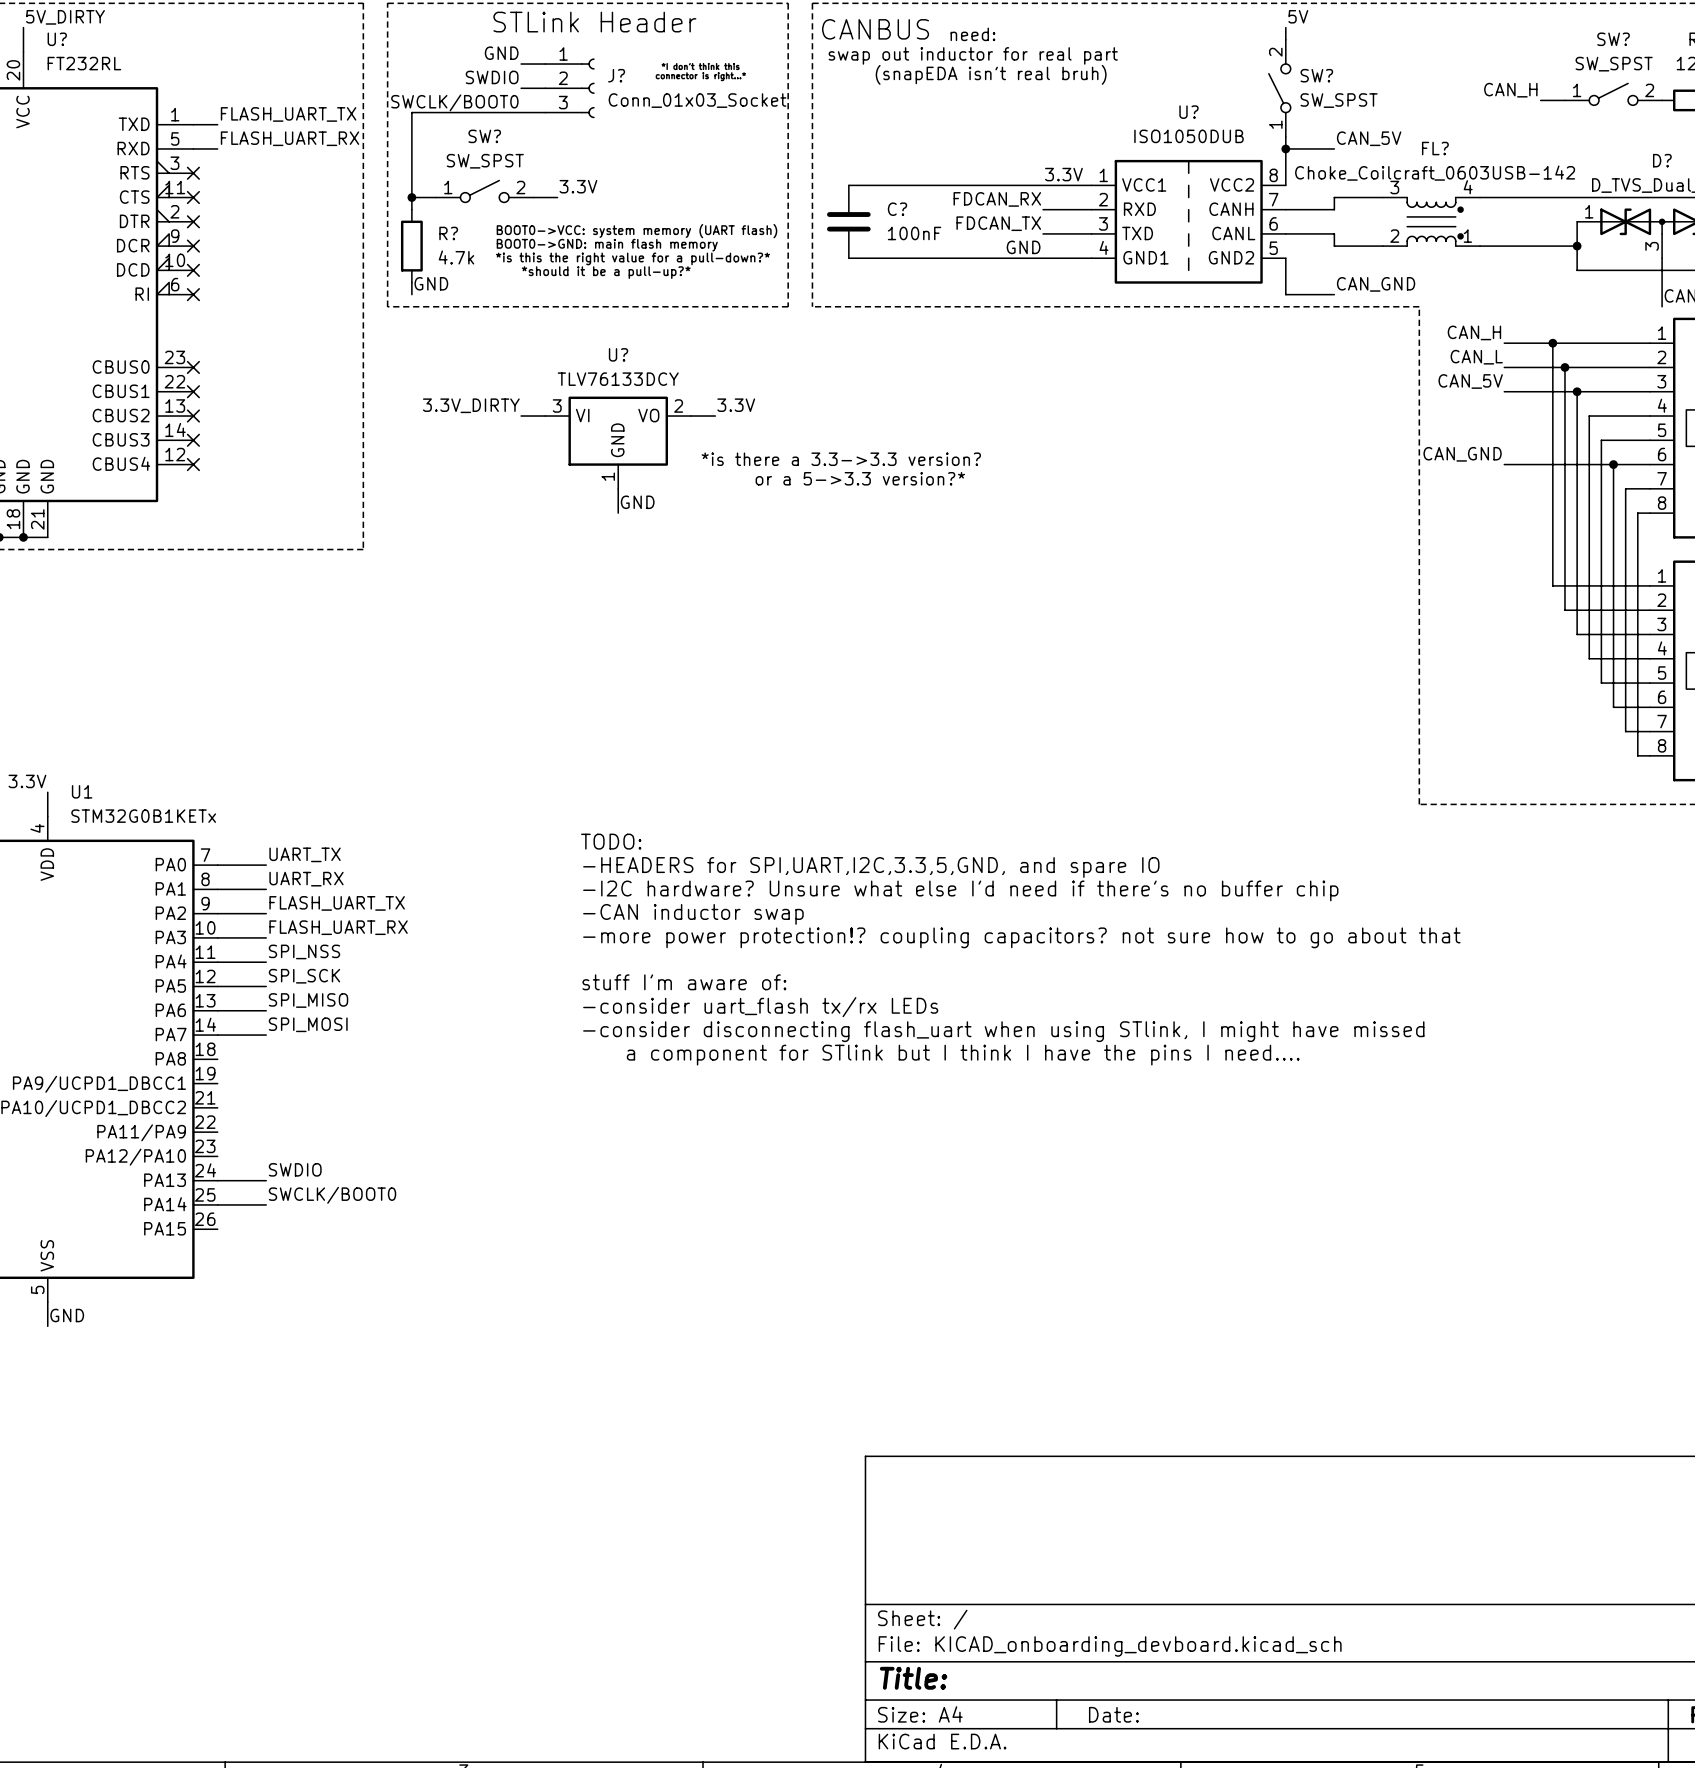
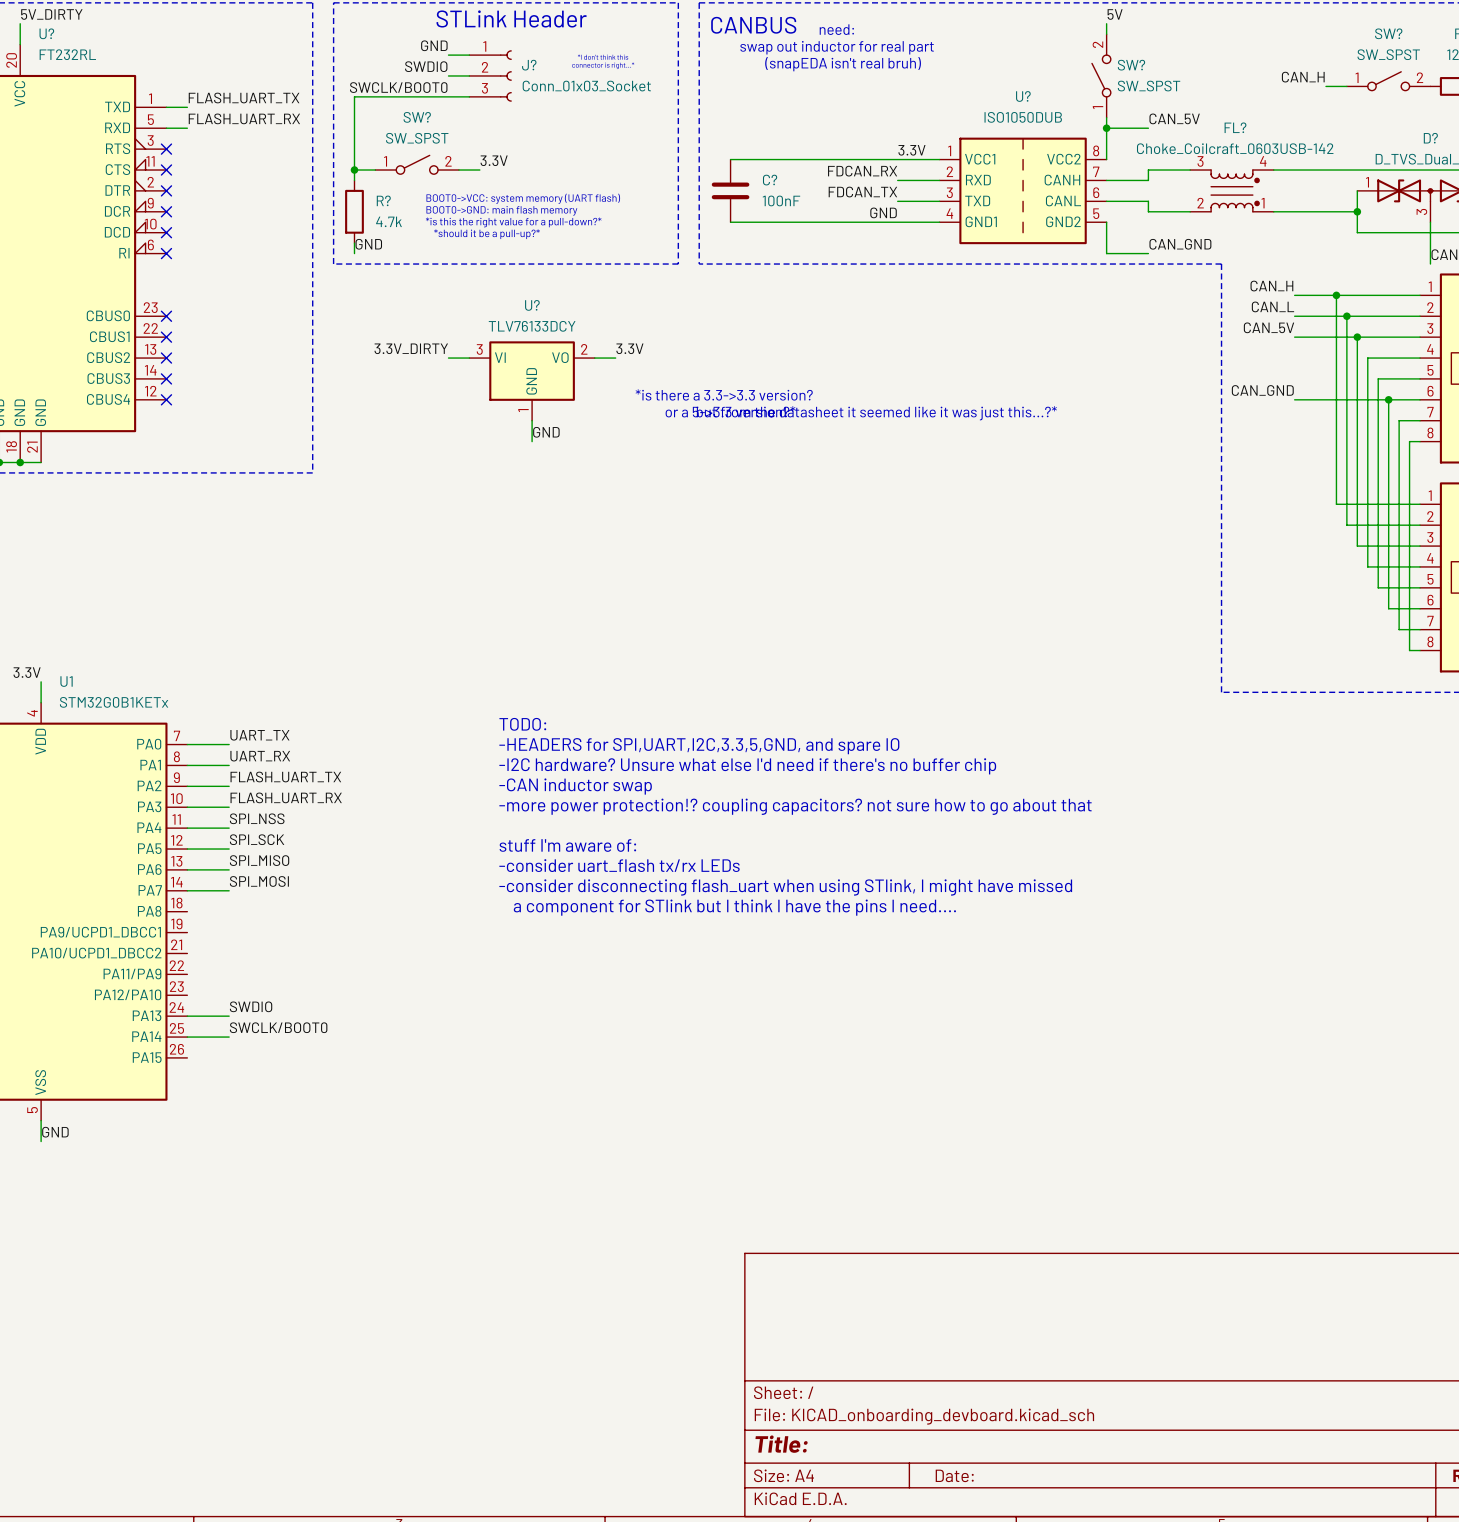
text: none -> but from the datasheet it seemed like it was just this...?* (876, 413)

